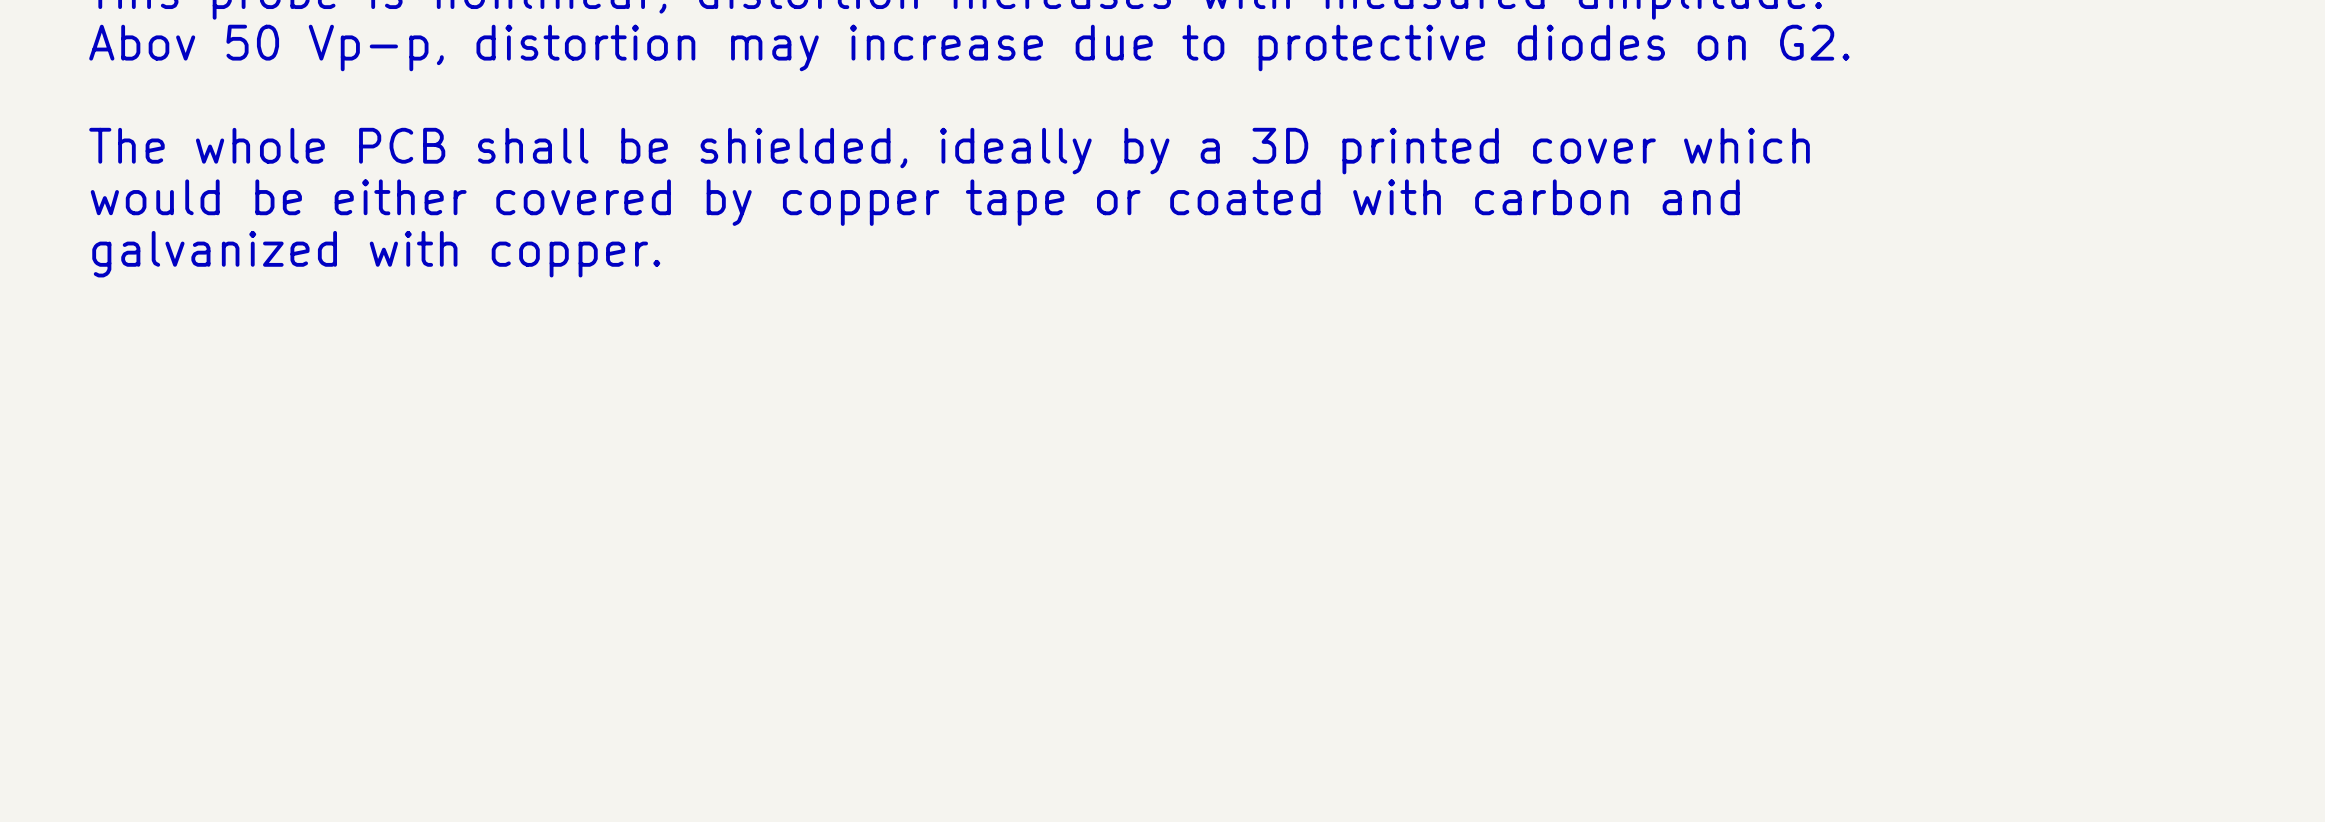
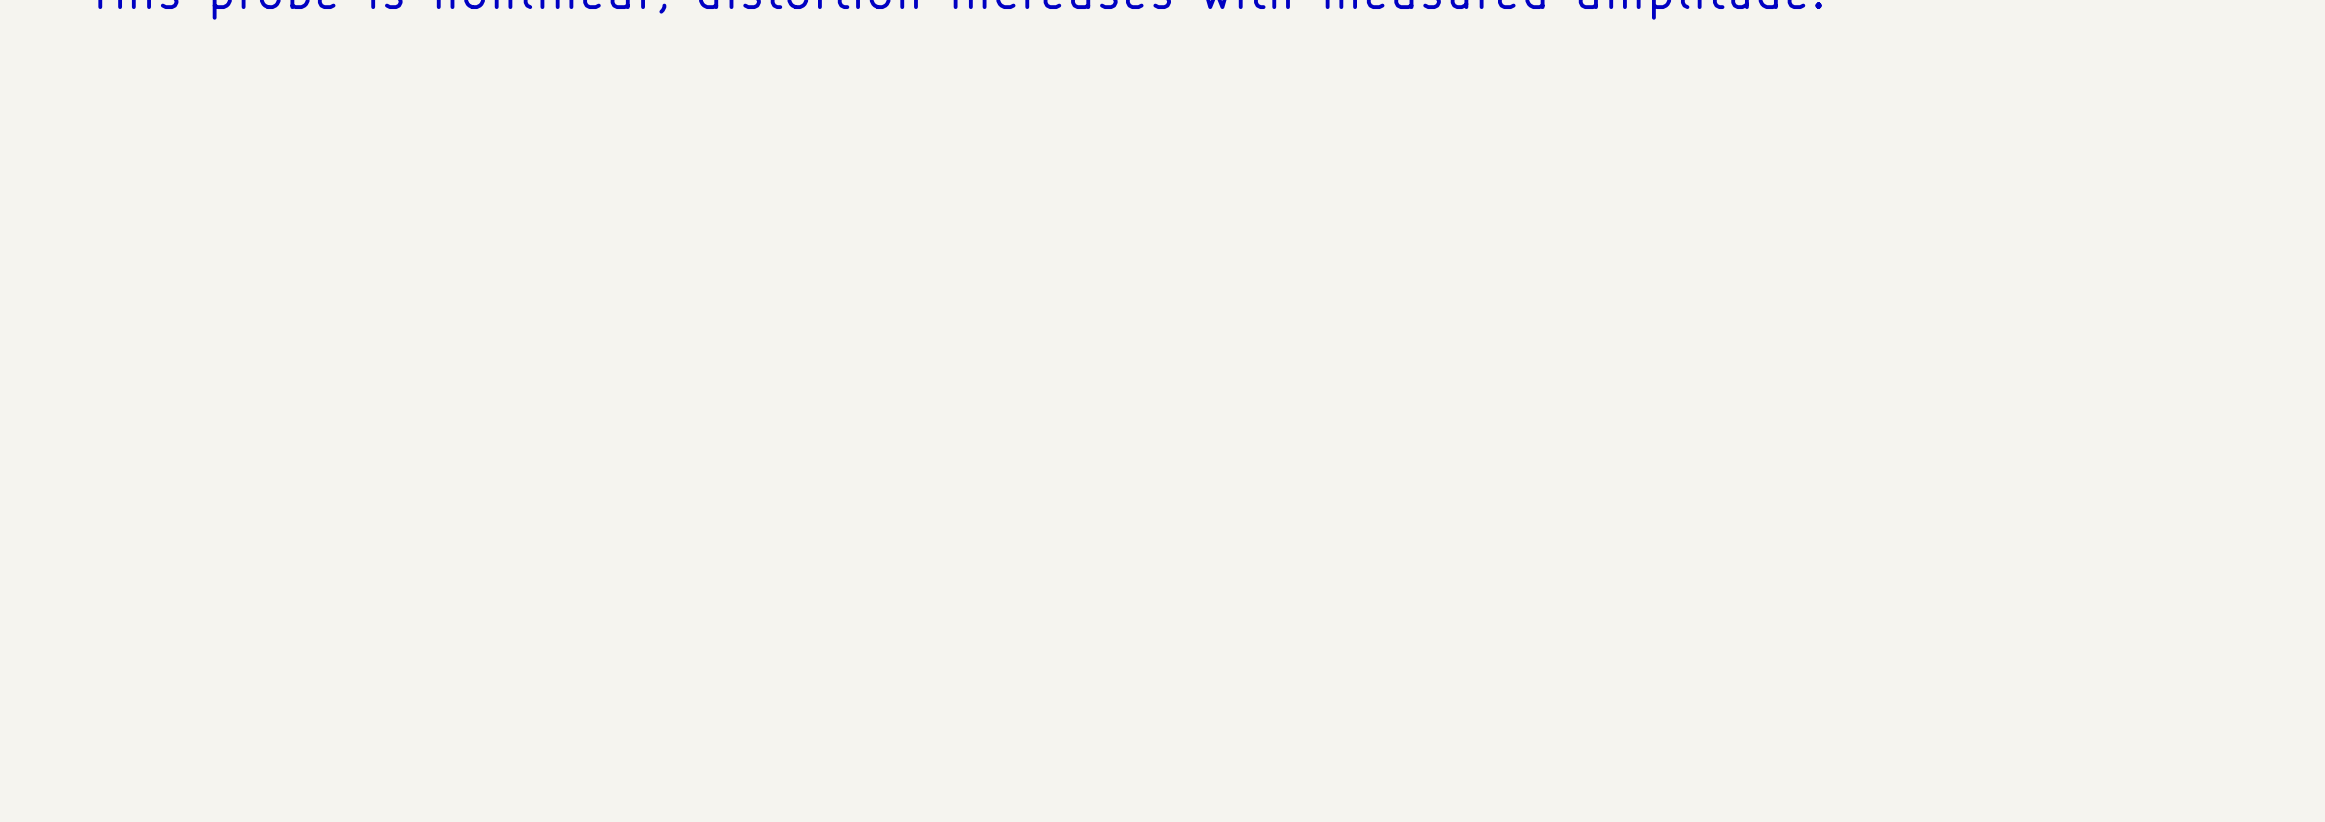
text: Abov 50 Vp-p, distortion may increase due to protective diodes on G2. (969, 47) -> none
text: The whole PCB shall be shielded, ideally by a 3D printed cover which (949, 151) -> none
text: would be either covered by copper tape or coated with carbon and (915, 202) -> none
text: galvanized with copper. (376, 254) -> none

